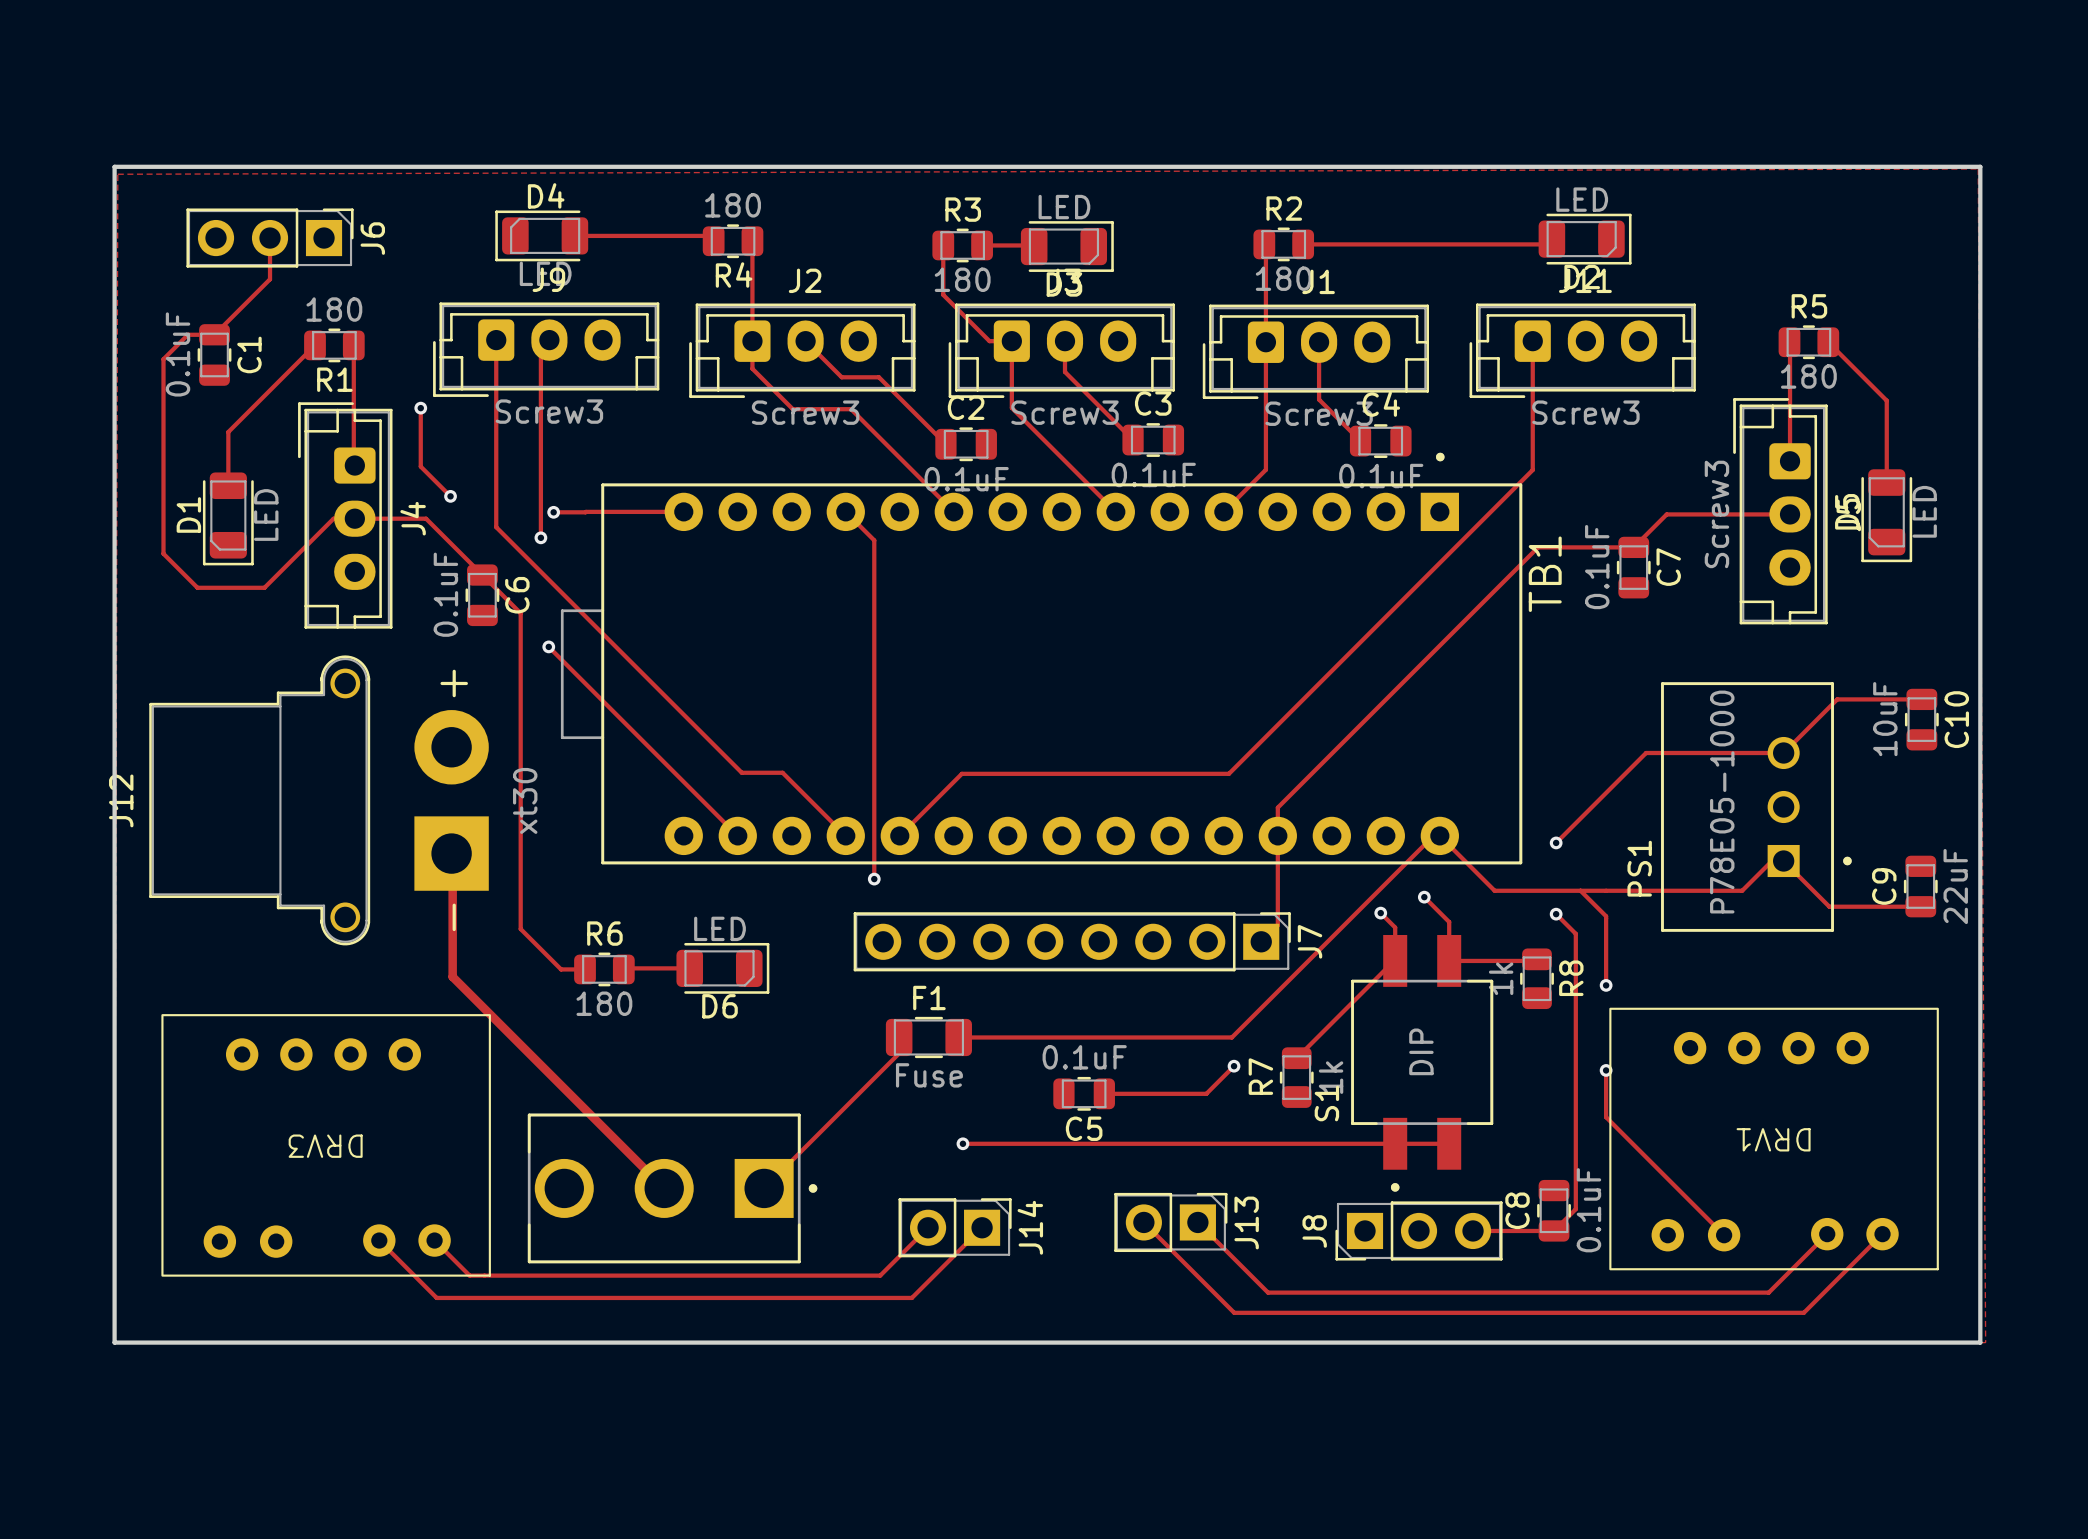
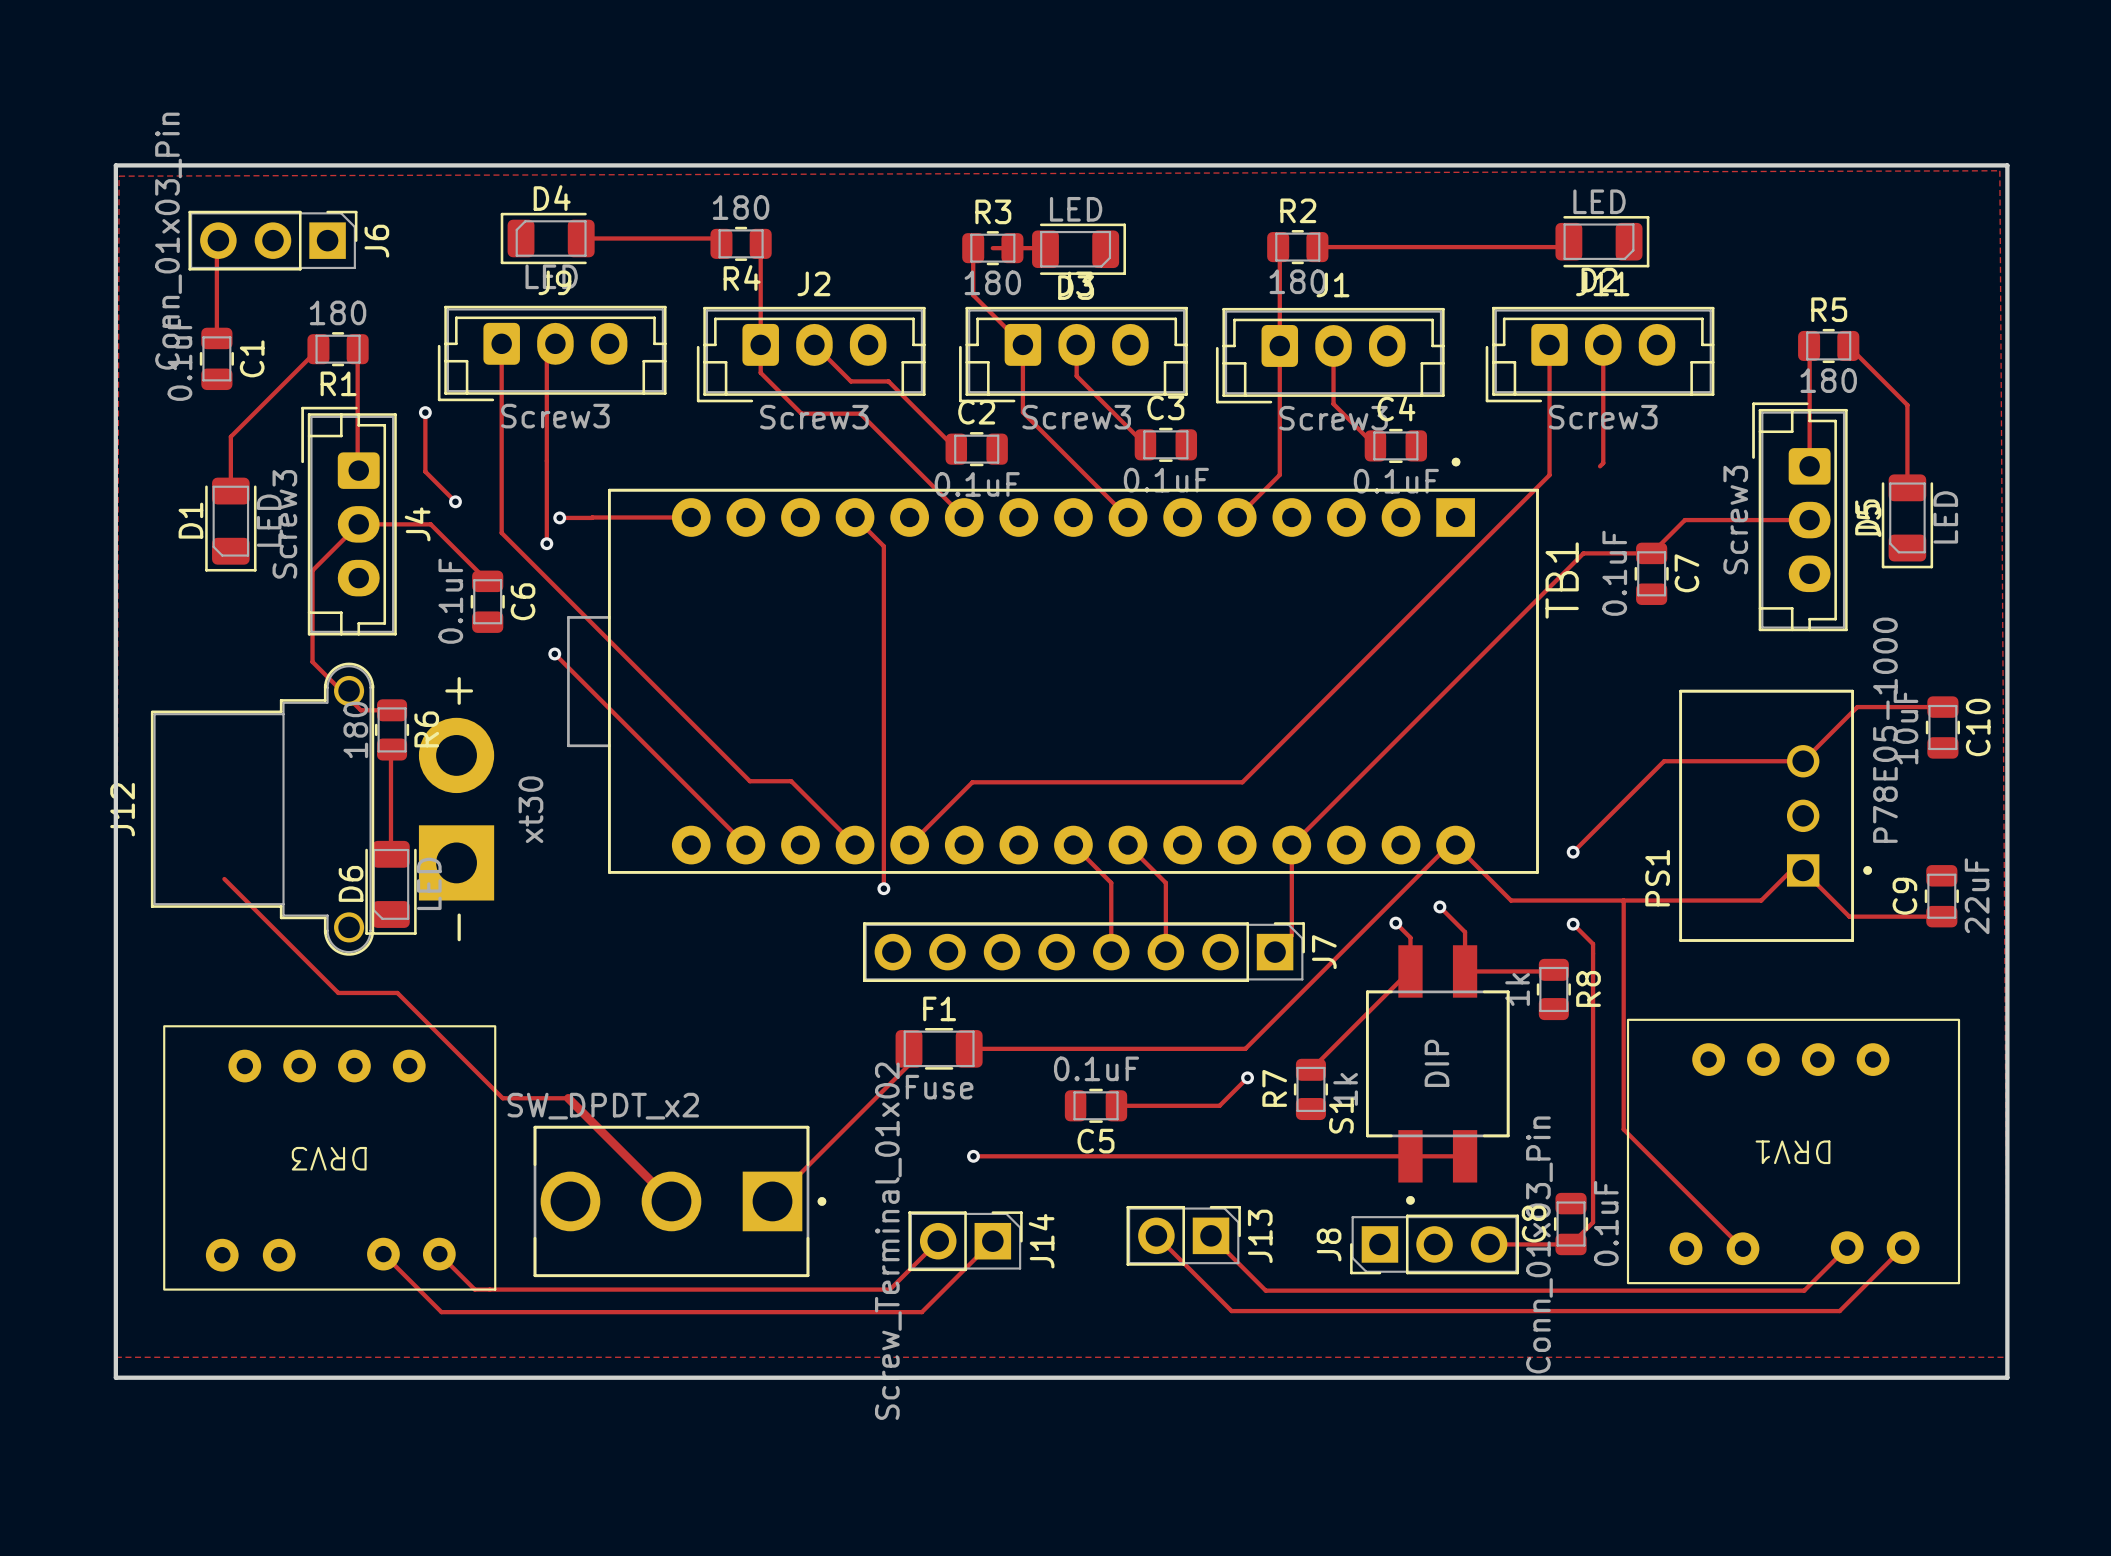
board edge: (114, 166) (1980, 166) (1980, 1342) (114, 1342) -> (115, 168) (115, 165) (2007, 165) (2007, 1377) (115, 1377) (115, 1357)
J6 value: none -> Conn_01x03_Pin (168, 241)
track: (270, 238) (270, 279) (214, 334) (187, 334) (163, 359) (163, 553) (197, 587) (264, 587) (333, 518) (354, 518) -> (392, 710) (360, 710) (312, 661) (312, 570) (358, 524)
track: none -> (216, 242) (216, 338)
track: (943, 245) (943, 294) (989, 341) (1011, 341) -> (973, 248) (973, 295) (1022, 344)
R3 position: (962, 245) -> (992, 248)
track: none -> (1603, 344) (1603, 463) (1600, 466)
J4 value: none -> Screw3 (284, 524)
track: (1566, 547) (1538, 547) (1277, 807) (1277, 835) -> (1583, 553) (1291, 845)
track: (482, 575) (520, 613) (520, 929) (561, 969) (585, 969) -> none
track: none -> (390, 750) (390, 854)
PS1 value position: P78E05-1000 (1722, 802) -> P78E05-1000 (1885, 730)
track: none -> (1073, 845) (1111, 882) (1111, 952)
track: none -> (1128, 845) (1165, 882) (1165, 952)
track: (451, 853) (452, 976) (562, 1086) -> (224, 879) (338, 992) (397, 992) (502, 1098) (568, 1098)
track: (1580, 890) (1606, 916) -> (1623, 900) (1623, 926)
track: (689, 968) (623, 969) -> none
D6 rotation: 0° (722, 968) -> 90° clockwise (390, 887)
D6 position: (722, 968) -> (390, 887)
R6 rotation: 0° (604, 969) -> 90° clockwise (392, 729)
R6 position: (604, 969) -> (392, 729)
track: none -> (1623, 996) (1623, 1082)
via: (1606, 985) -> none
via: (1606, 1070) -> none
part value: none -> SW_DPDT_x2 (603, 1106)
J14 value: none -> Screw_Terminal_01x02 (888, 1241)
J8 value: none -> Conn_01x03_Pin (1539, 1244)
track: (1252, 1276) (1268, 1292) (1768, 1292) (1784, 1276) -> (1265, 1290) (1804, 1290)
track: (1218, 1296) (1234, 1312) (1803, 1312) (1819, 1296) -> (1231, 1311) (1839, 1311)

